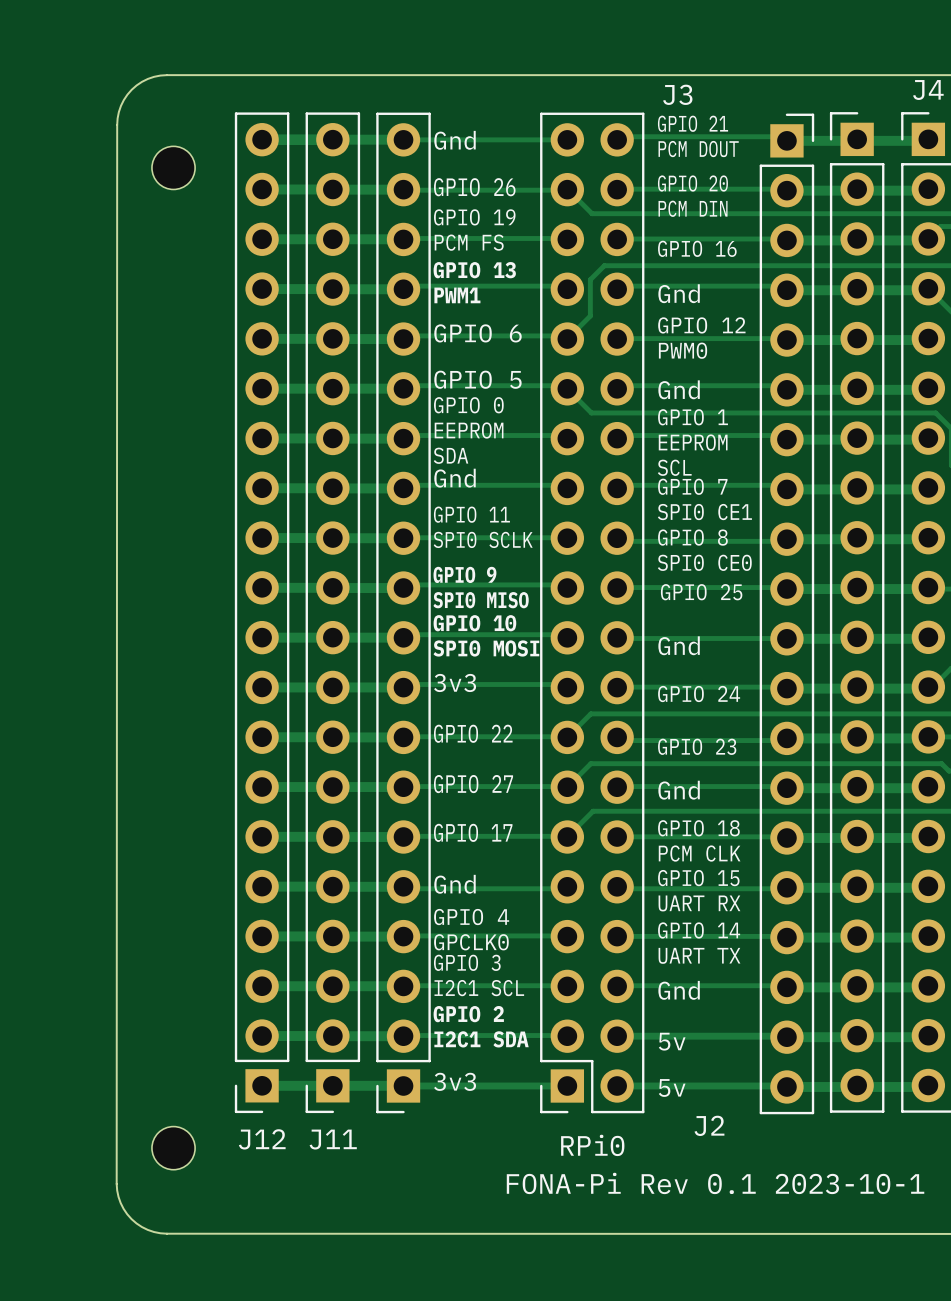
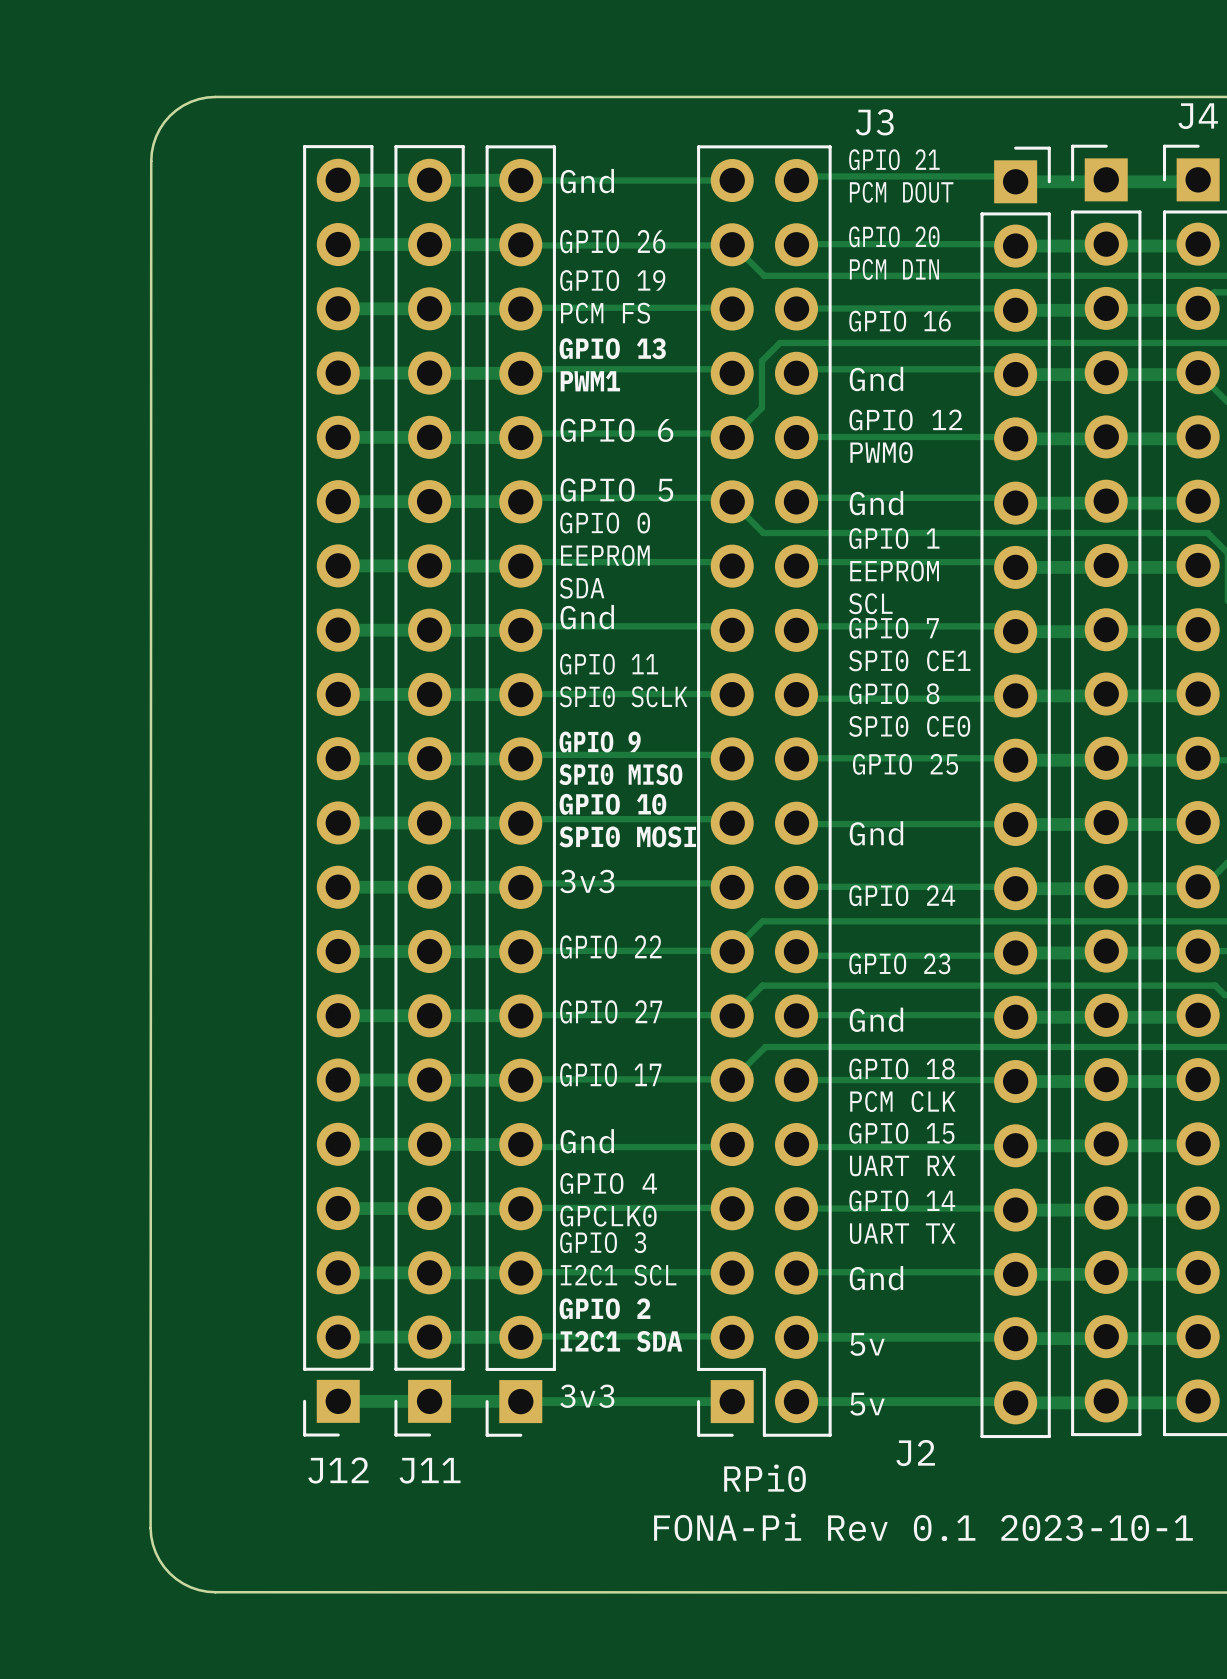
part: (173, 167) -> none
part: (173, 1148) -> none

